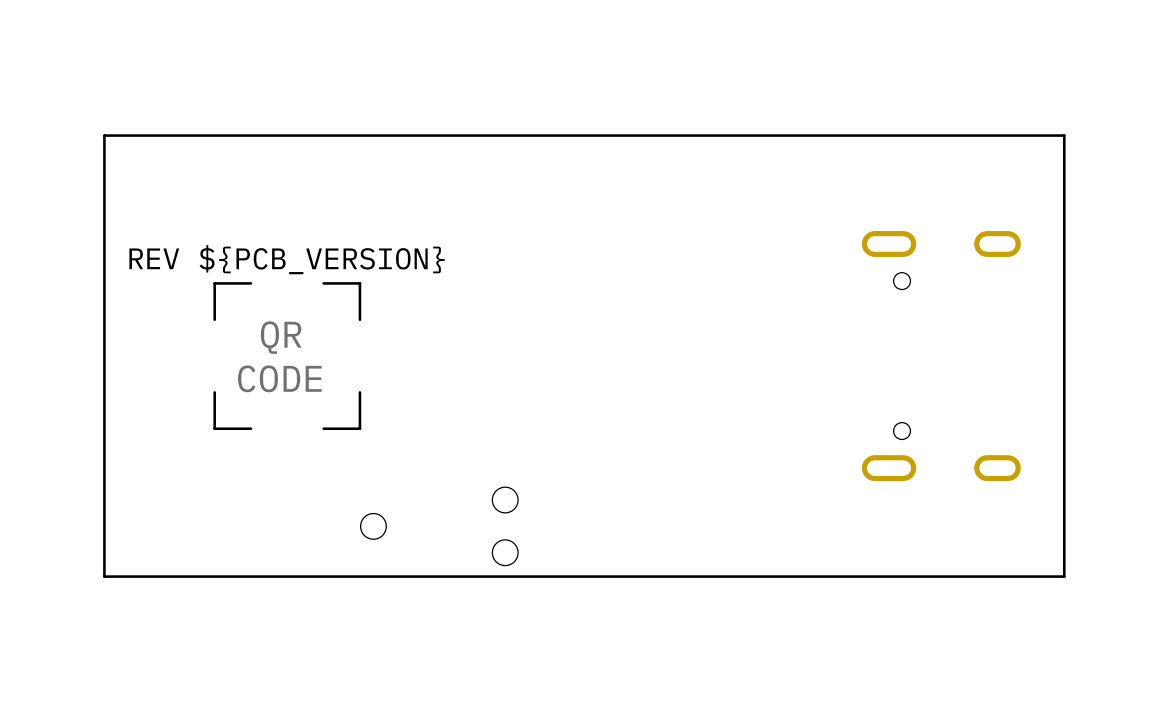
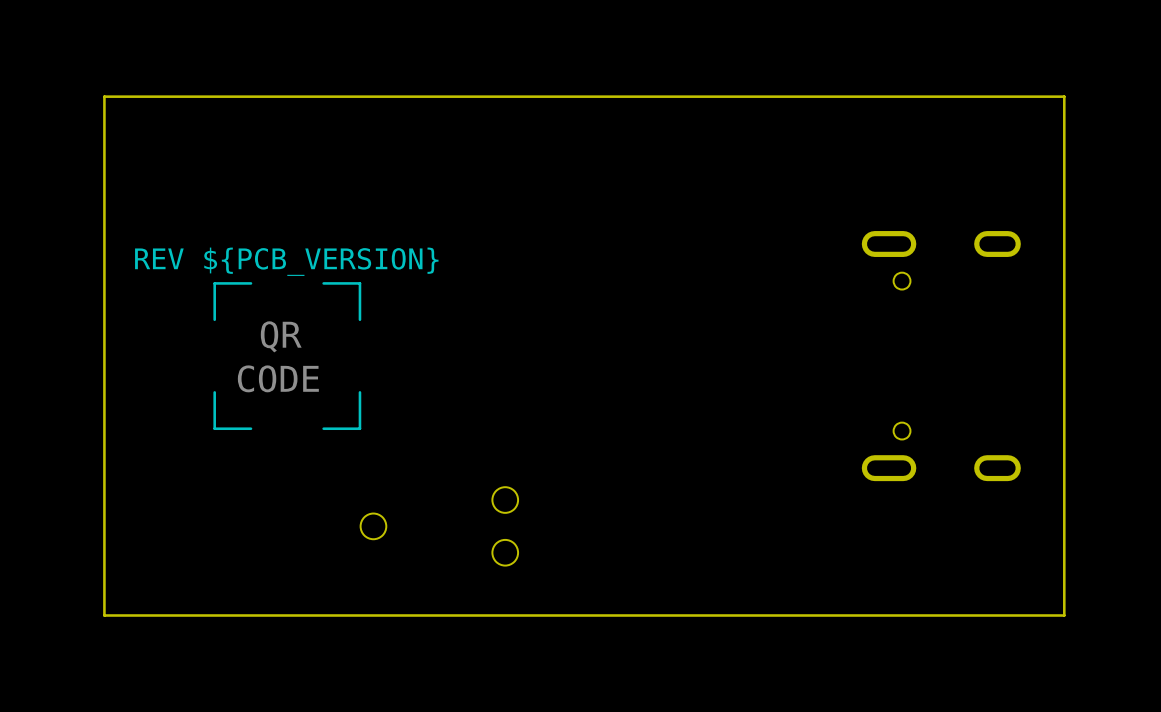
board edge: (1064, 135) (104, 135) -> (1064, 135) (1064, 96) (104, 96) (104, 135)
board edge: (1064, 576) (104, 576) -> (1064, 576) (1064, 615) (104, 615) (104, 576)

